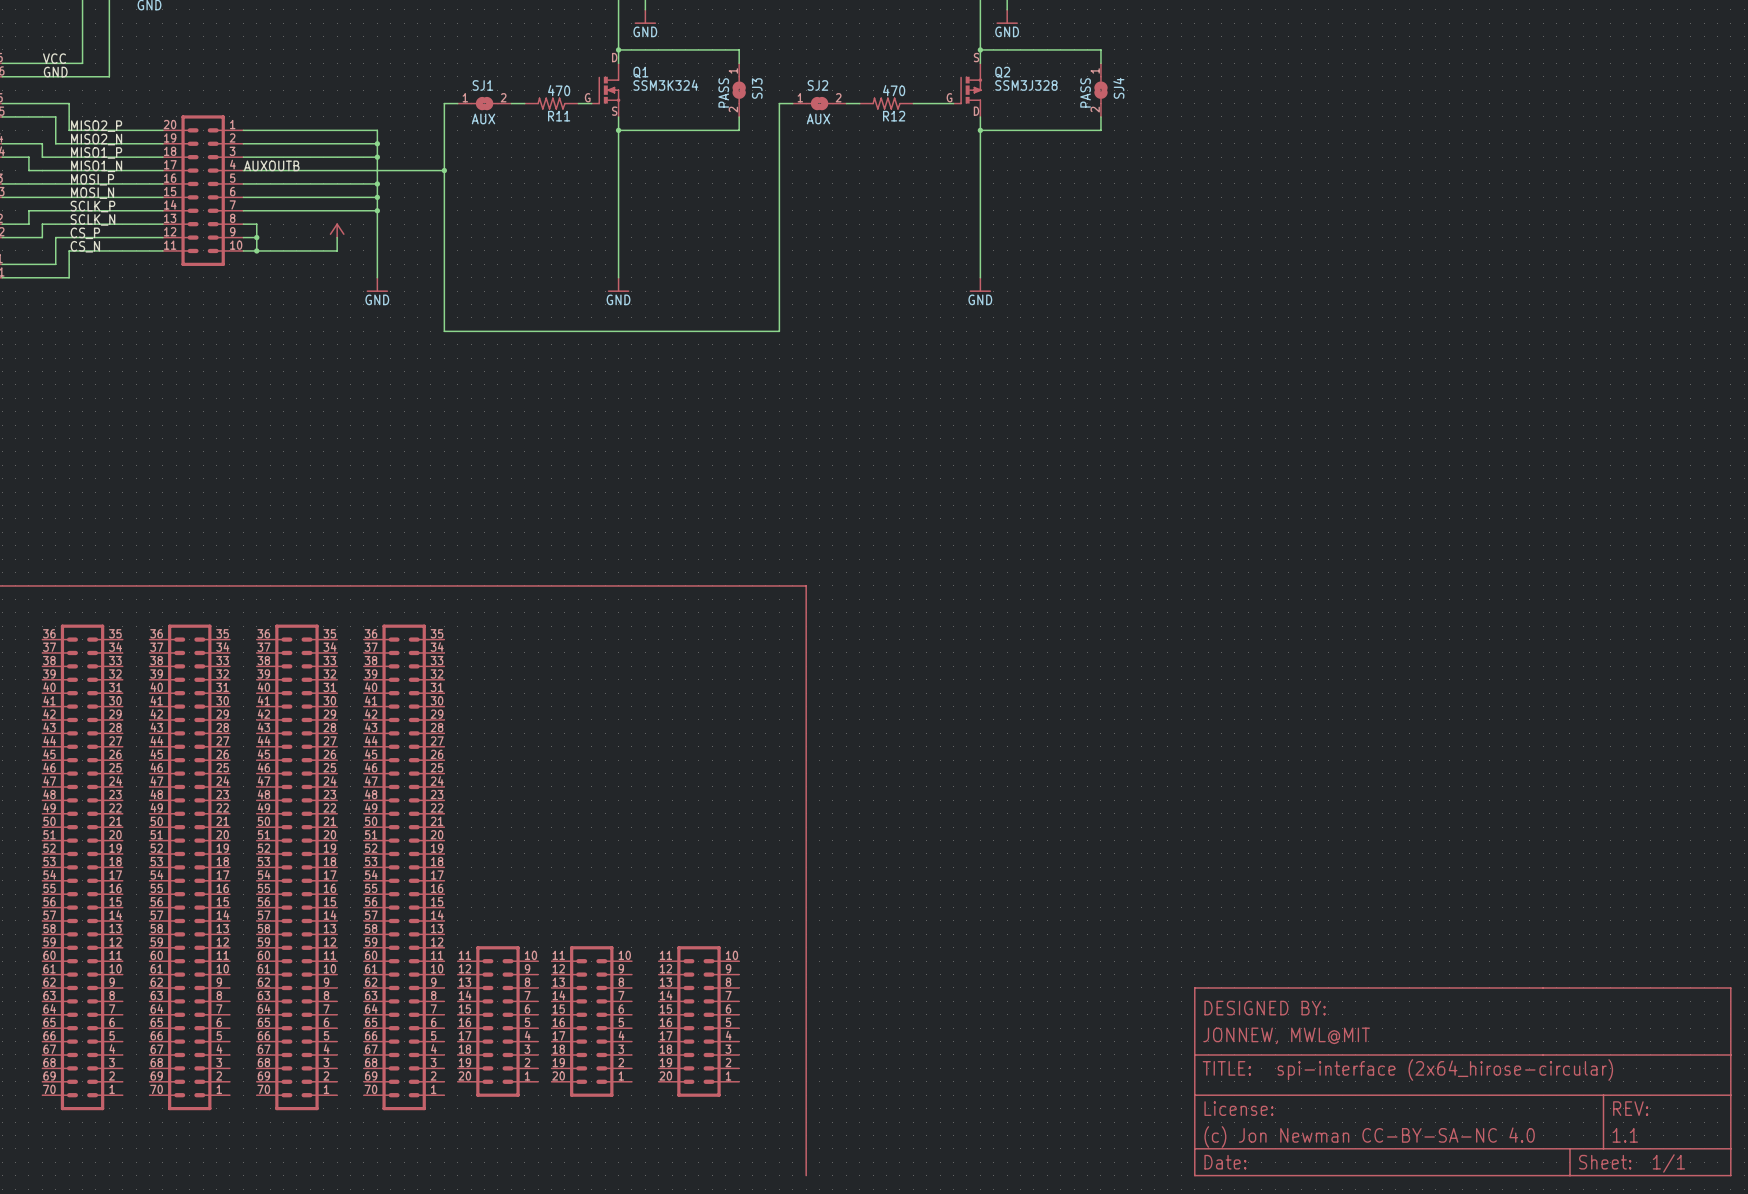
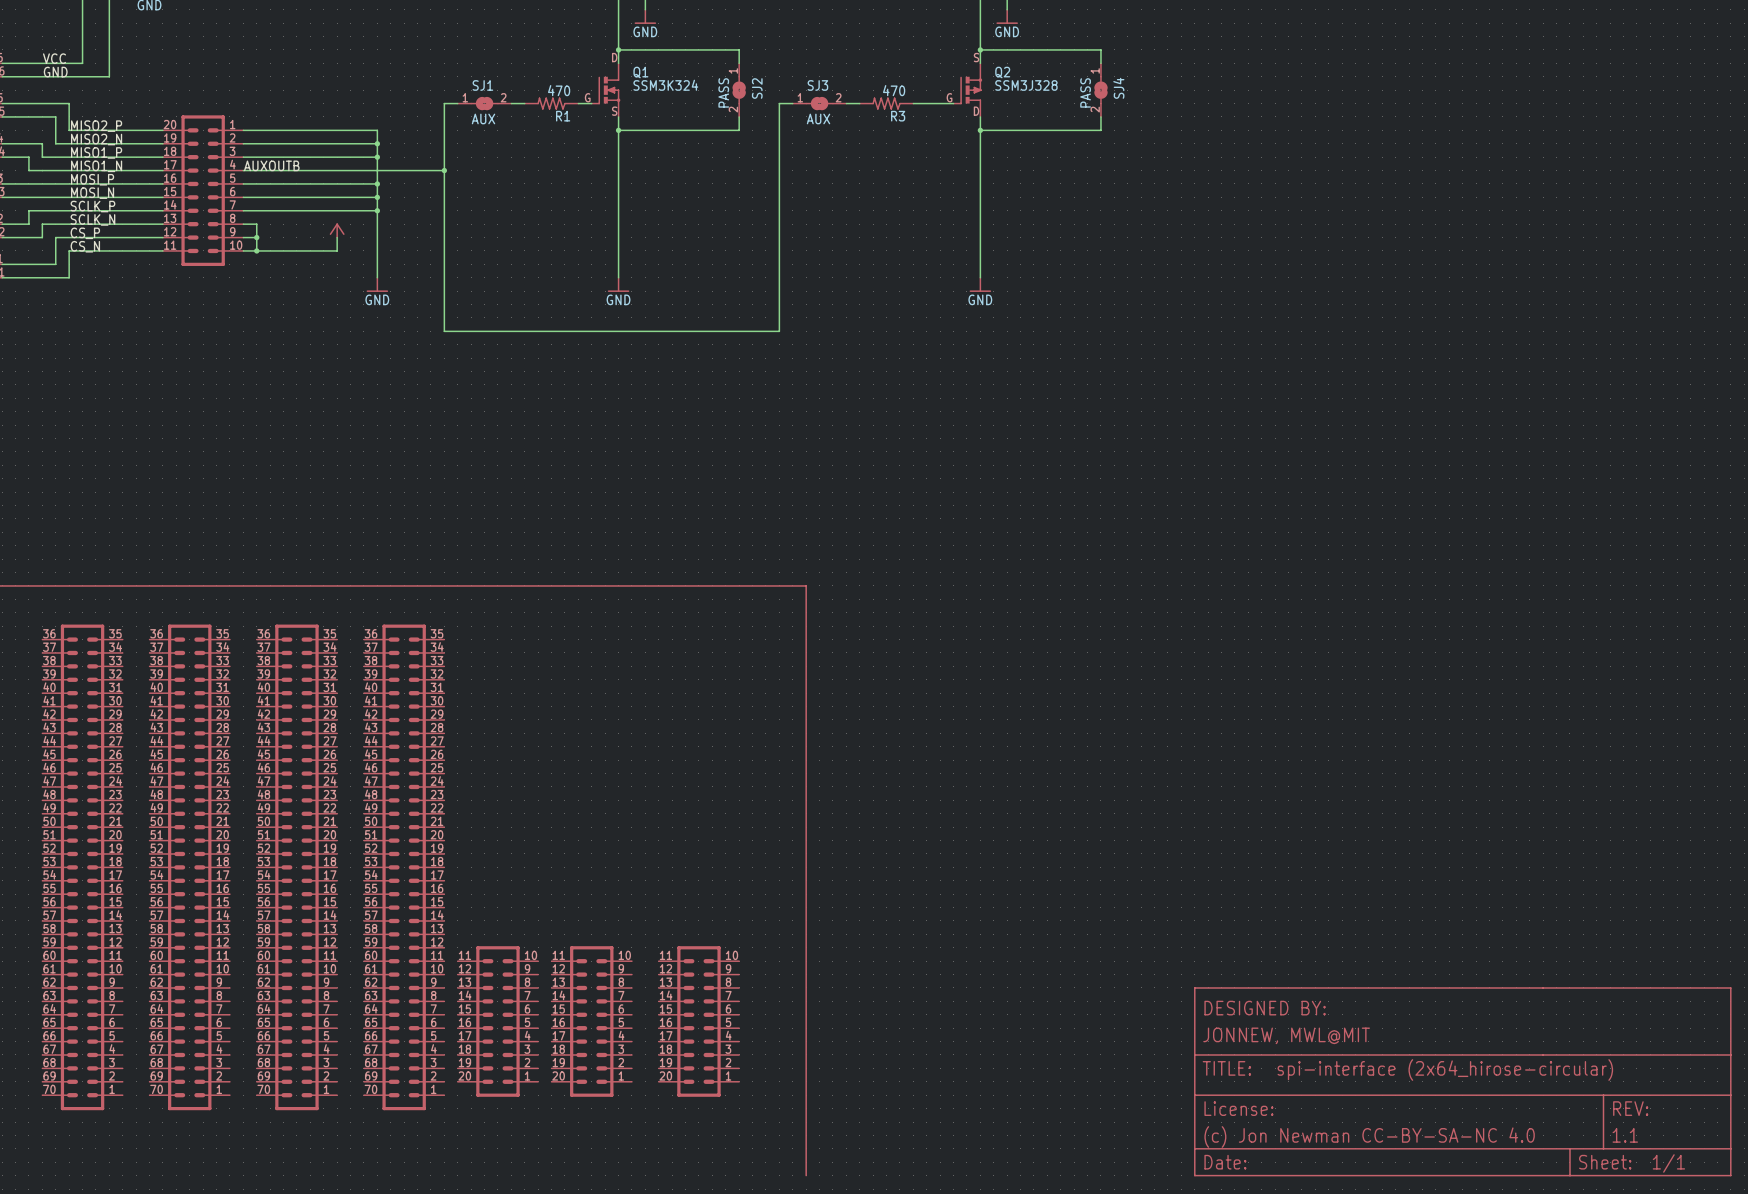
SJ2 name: SJ2 (817, 85) -> SJ3 (817, 85)
SJ3 name: SJ3 (757, 88) -> SJ2 (757, 88)
R11 name: R11 (559, 116) -> R1 (563, 116)
R12 name: R12 (894, 116) -> R3 (898, 116)

